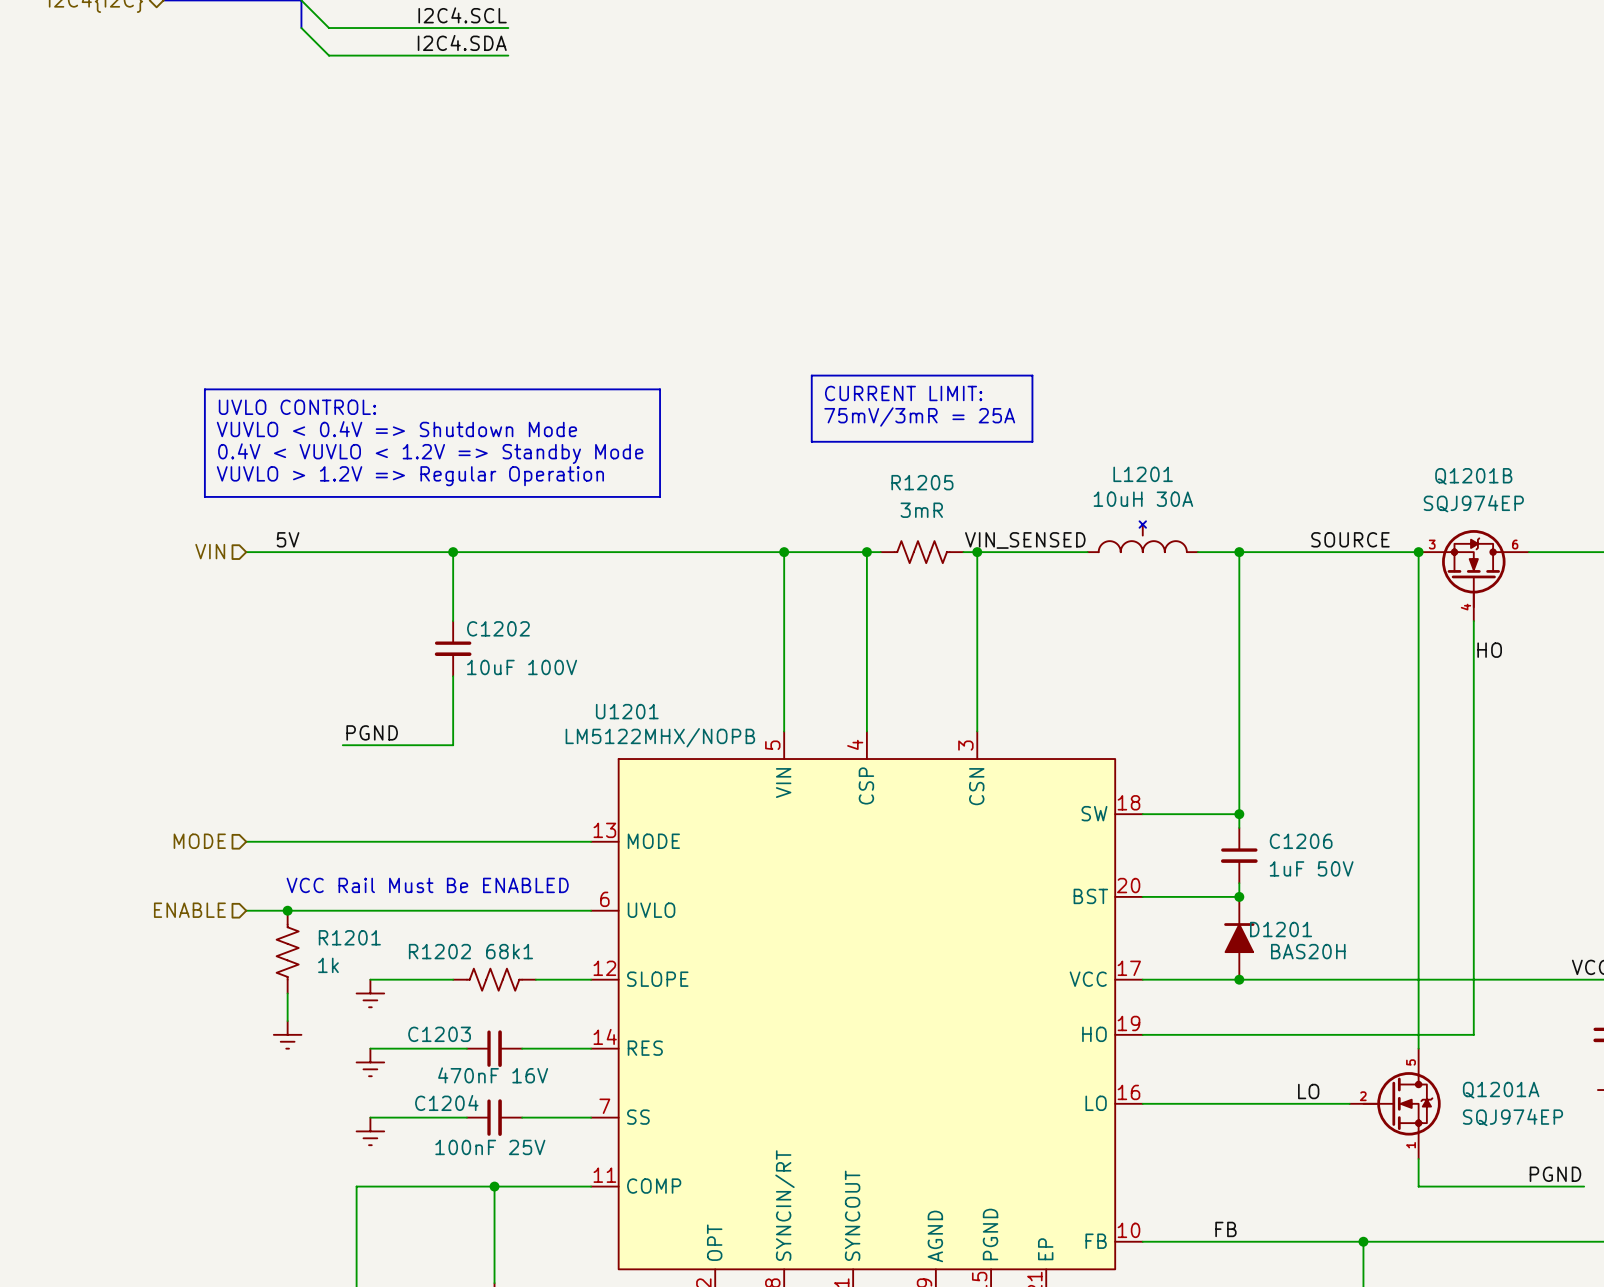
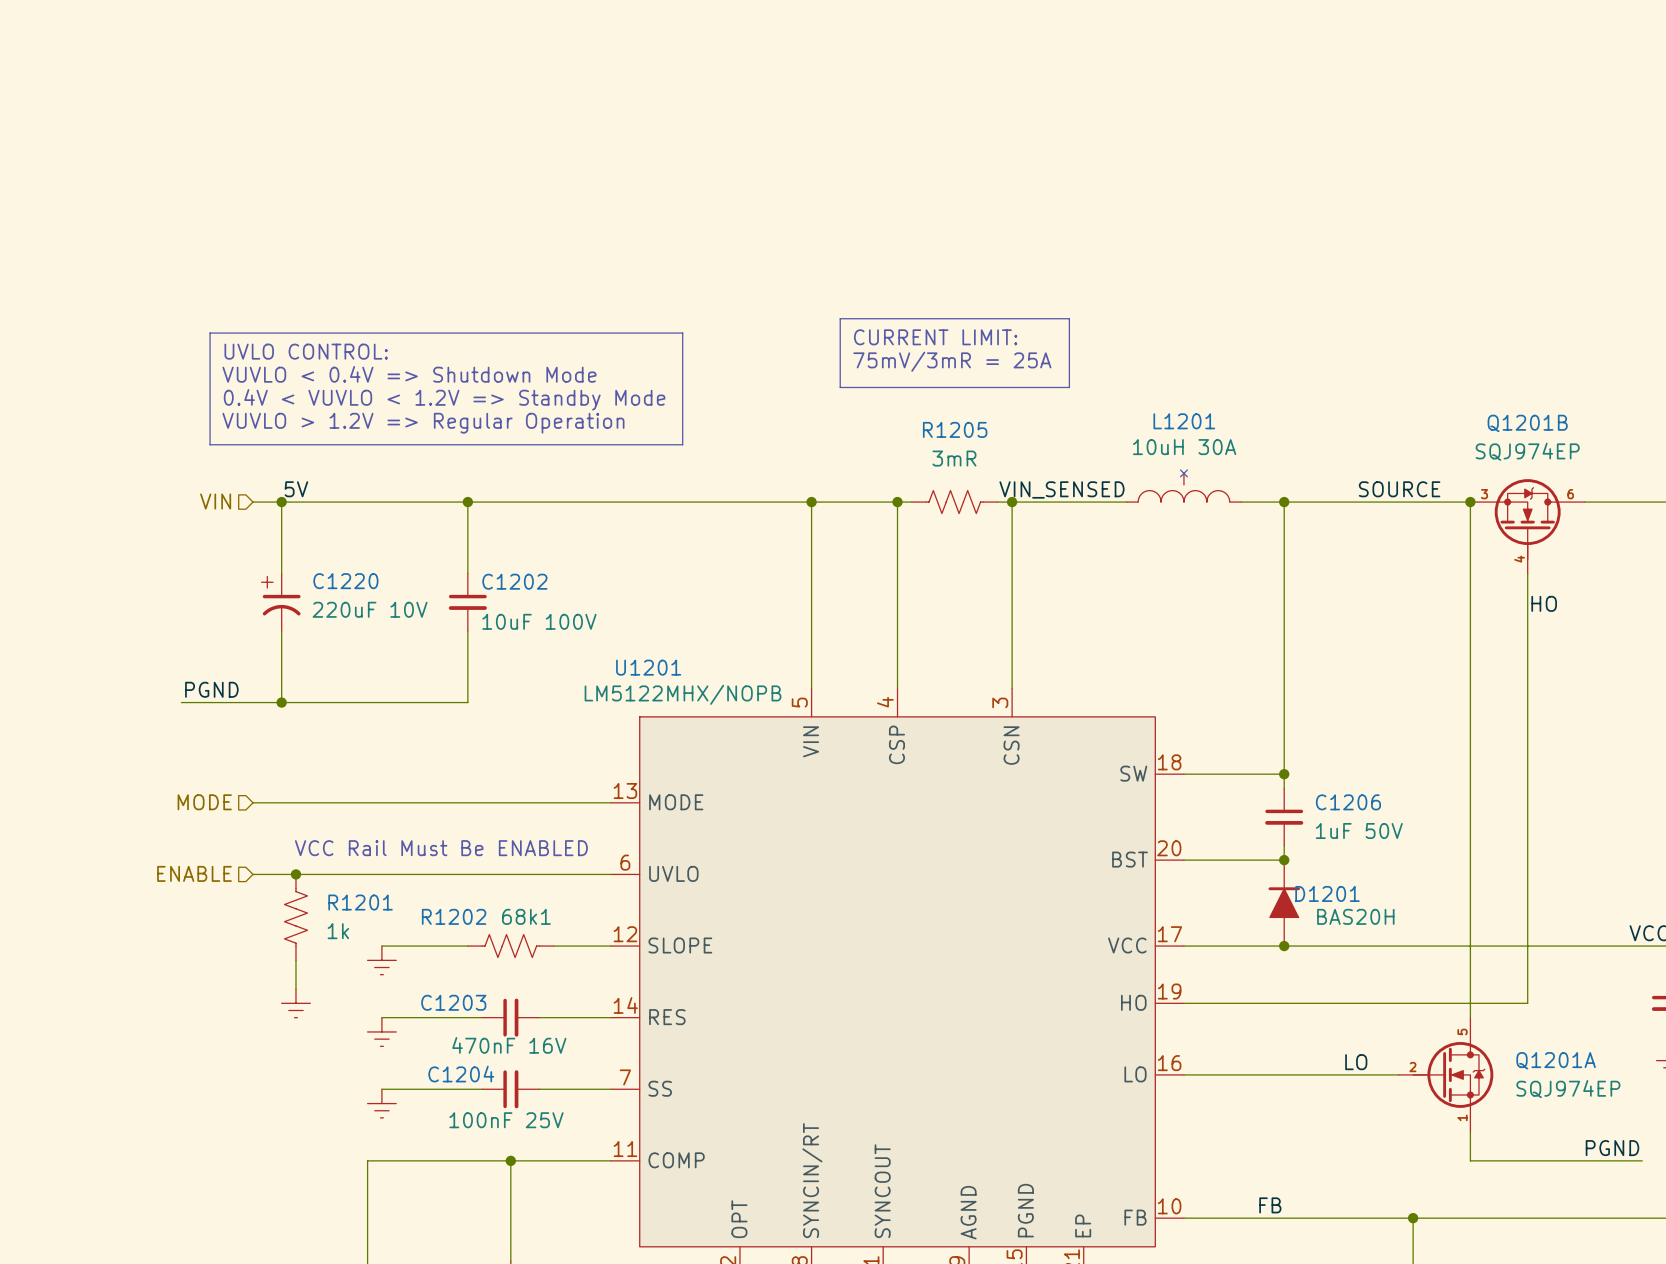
wire: none -> (281, 502) (281, 573)
junction: none -> (281, 502)
C1220: none -> 220uF 10V (281, 602)
wire: none -> (281, 630) (281, 702)
label position: PGND (372, 732) -> PGND (211, 689)
wire: none -> (181, 702) (353, 702)
junction: none -> (281, 702)

